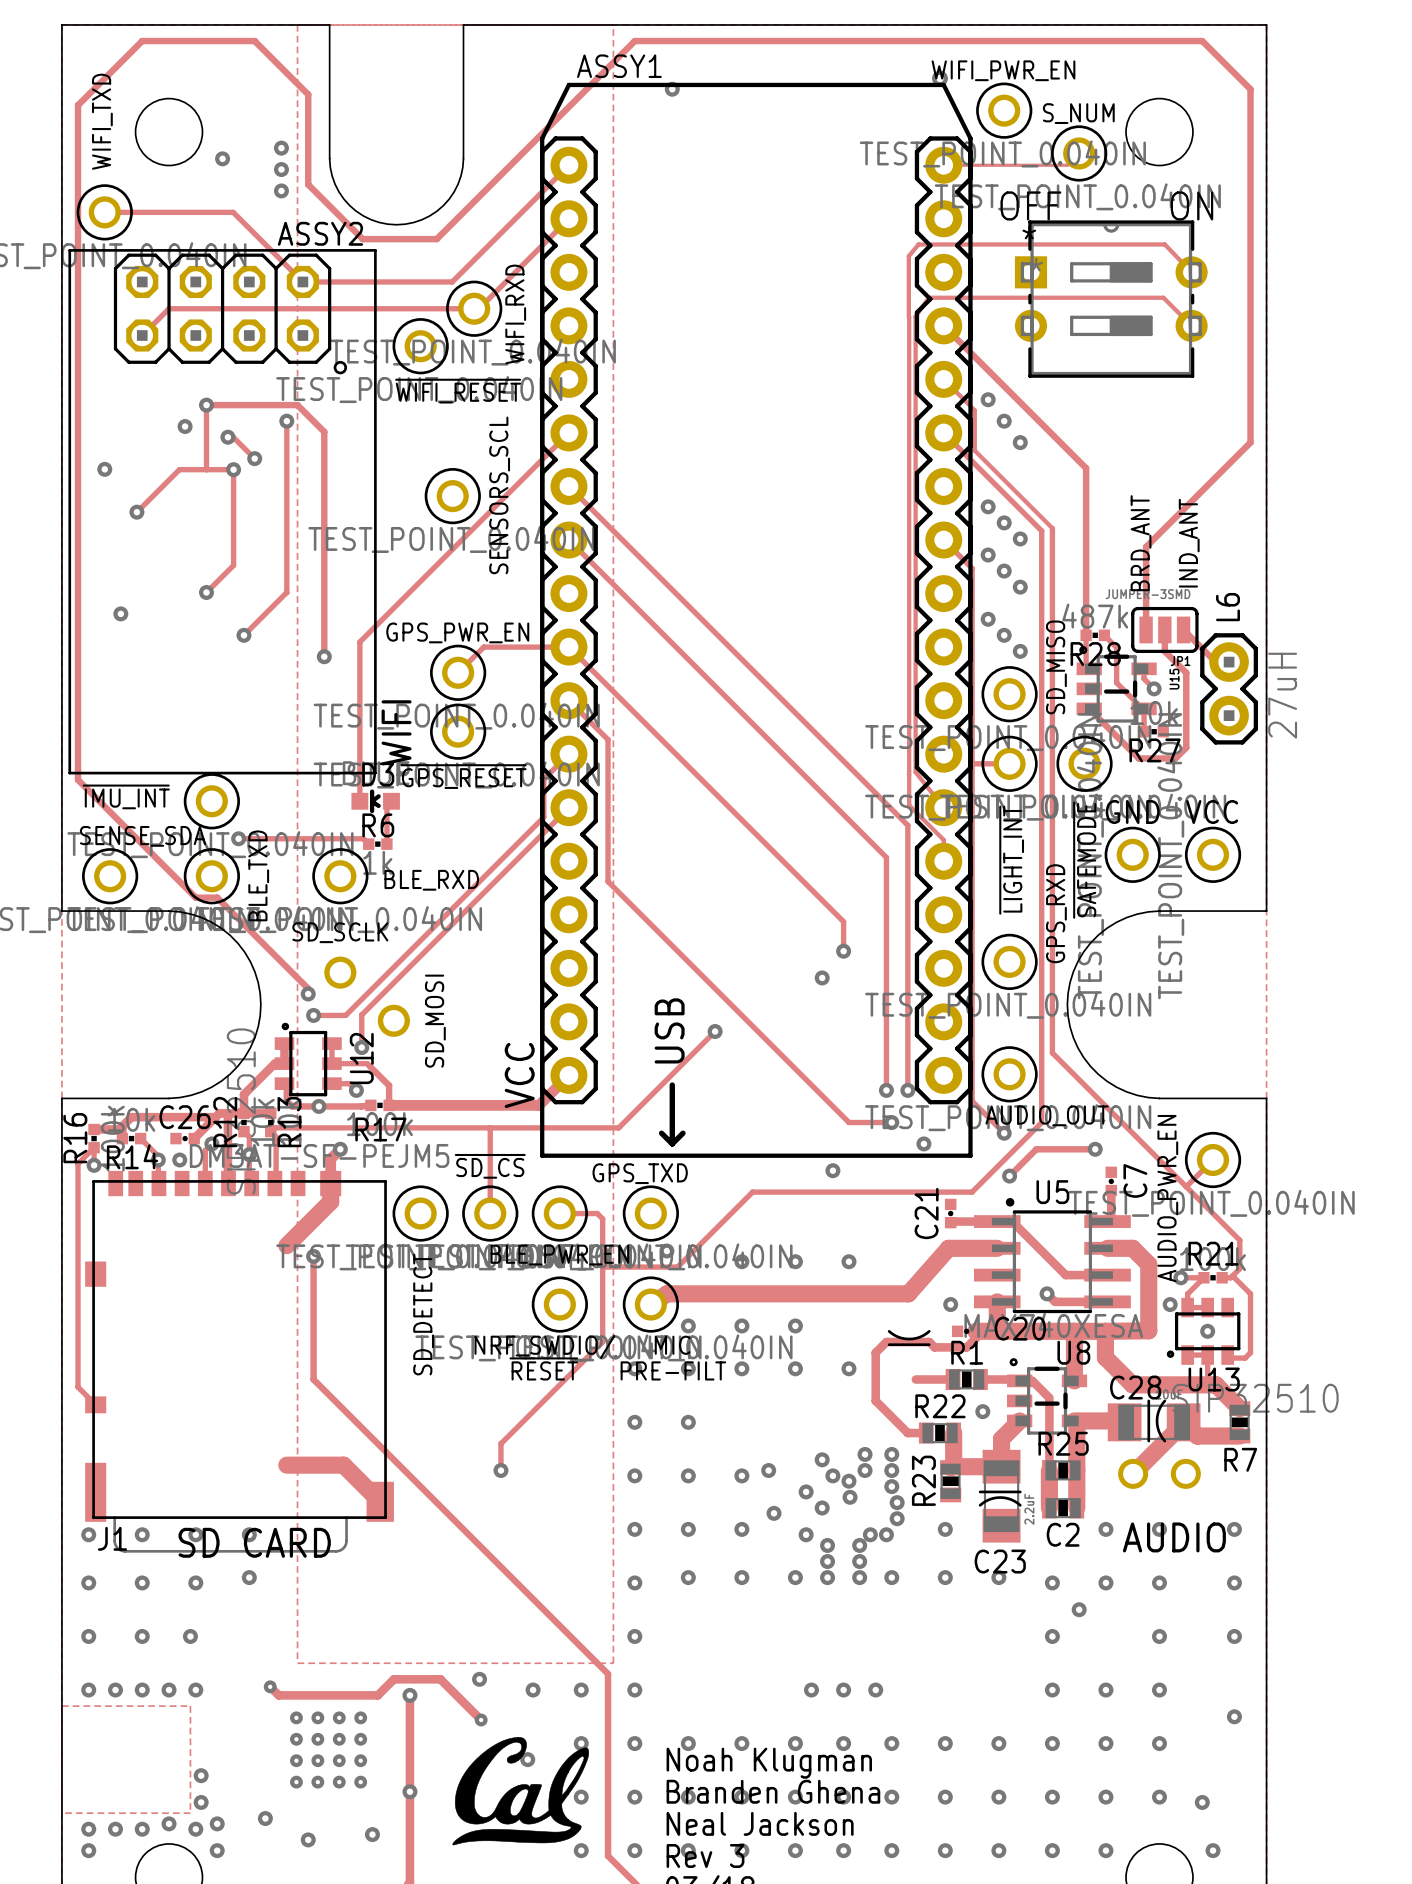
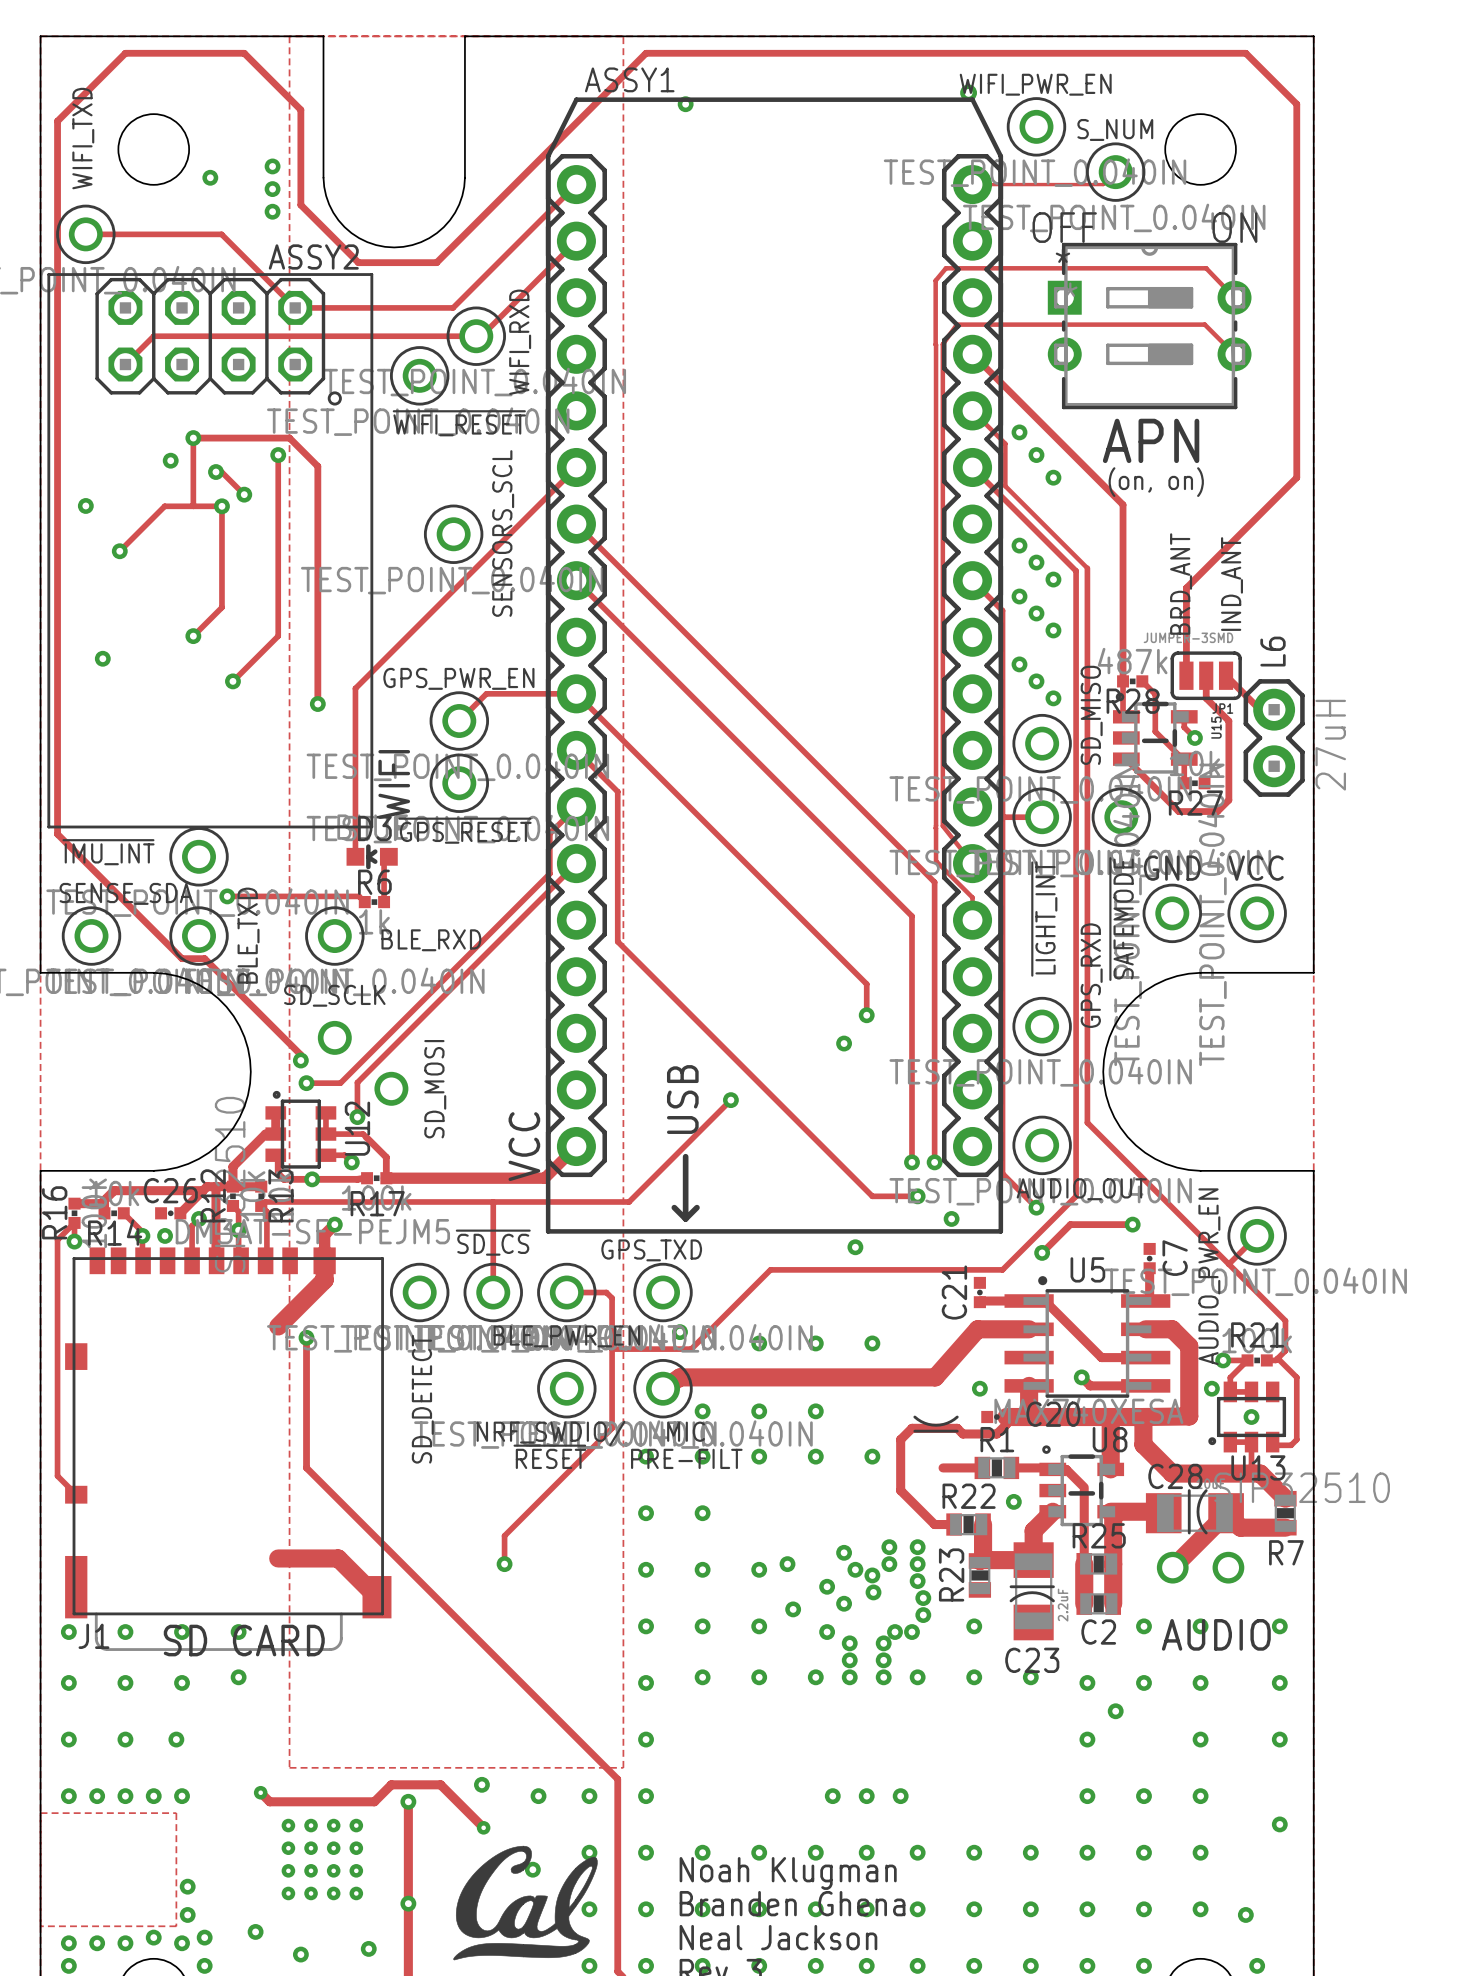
text: none -> APN (1151, 440)
text: none -> (on, on) (1156, 482)

